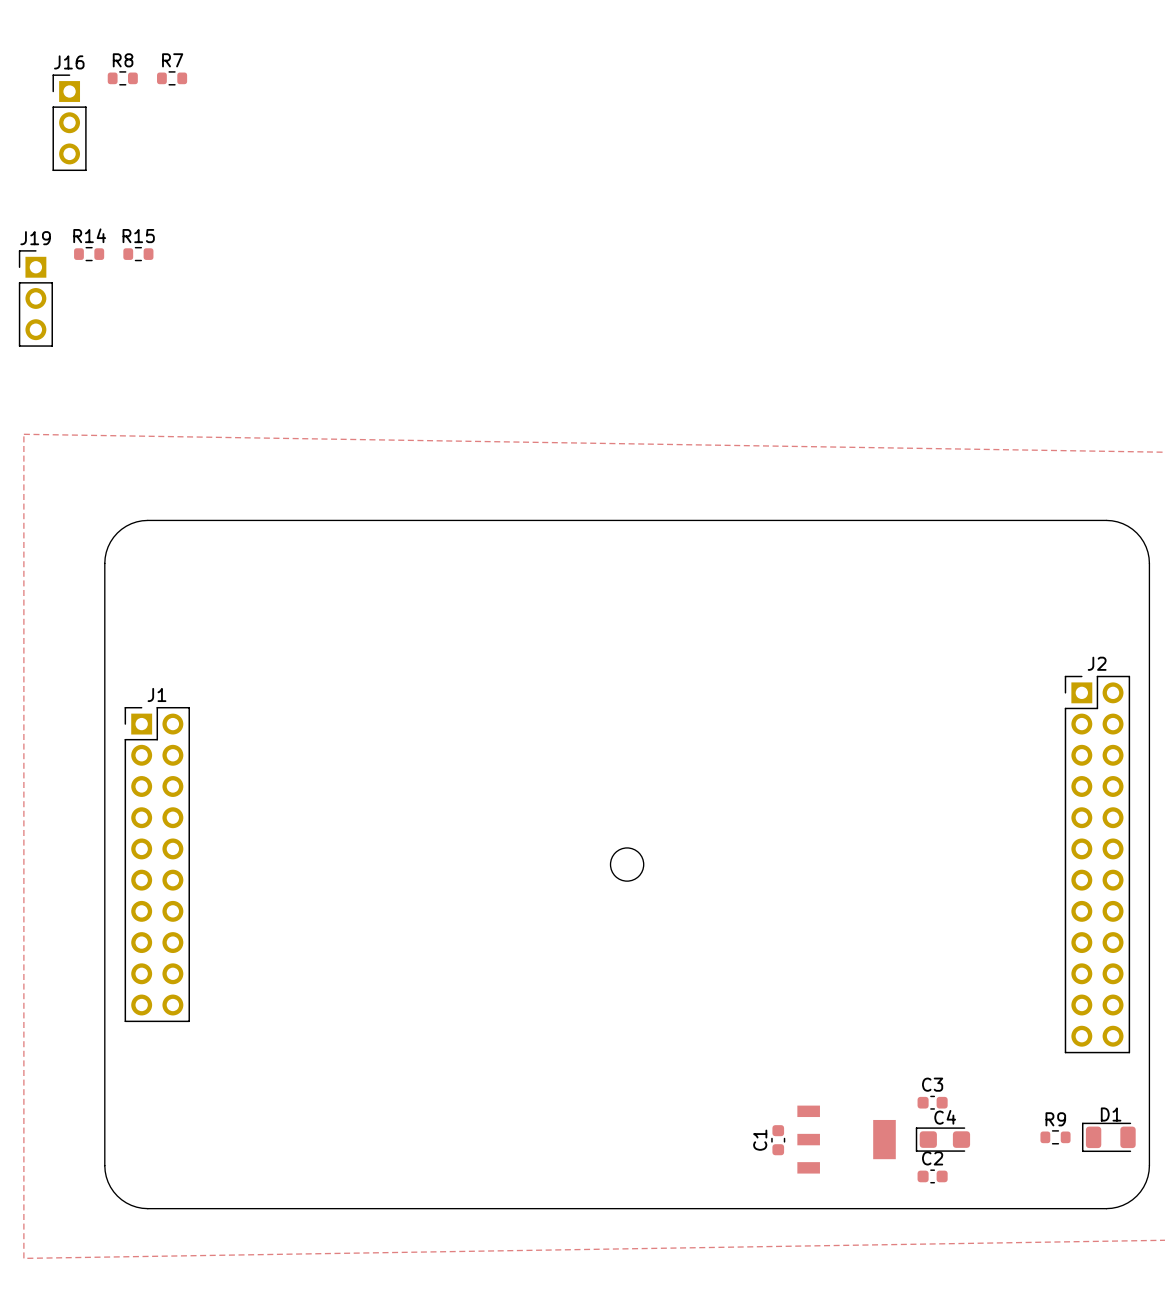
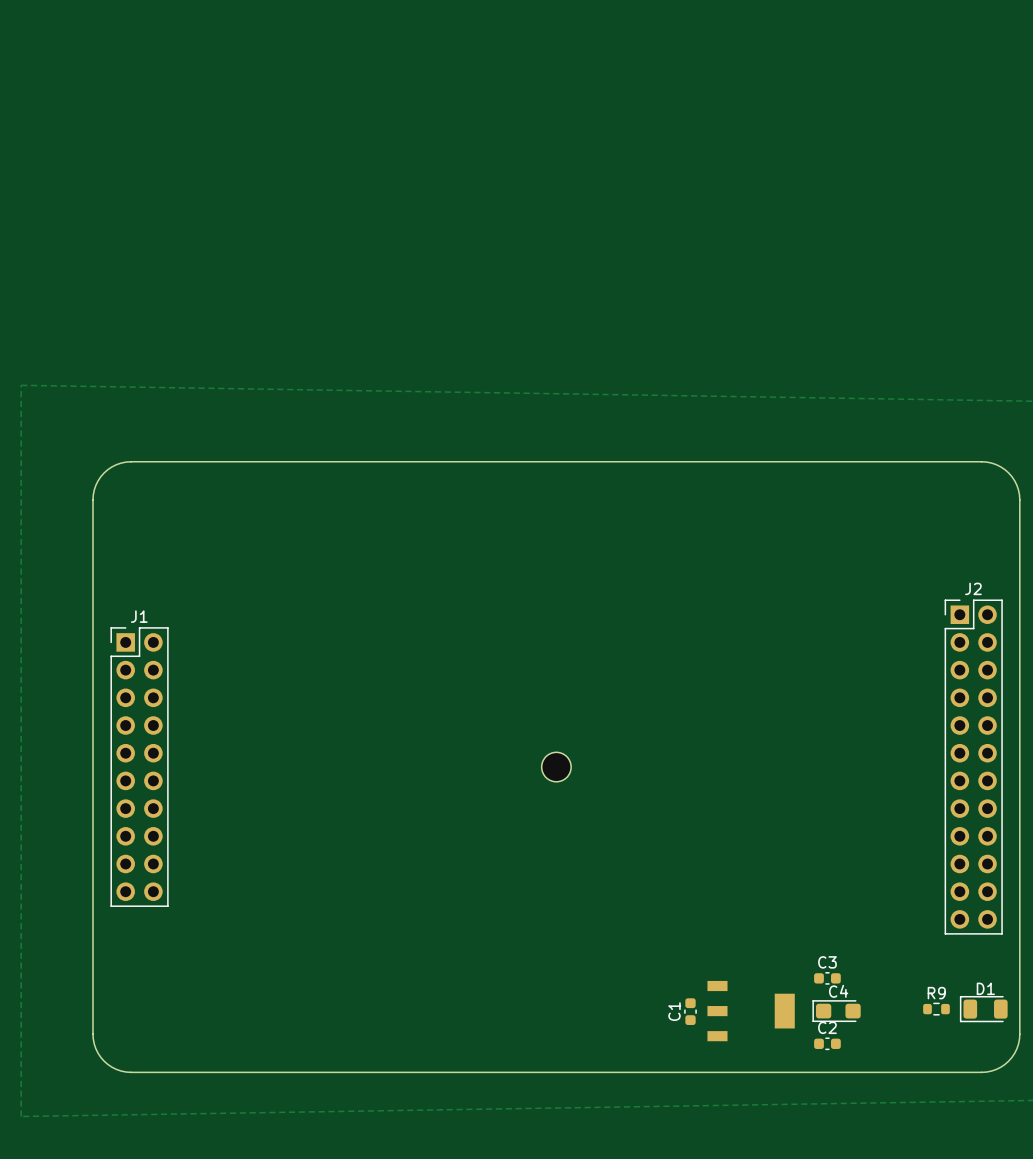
R8: (122, 78) -> none
R7: (172, 78) -> none
J16: (69, 122) -> none
R14: (89, 254) -> none
R15: (138, 254) -> none
J19: (35, 298) -> none

